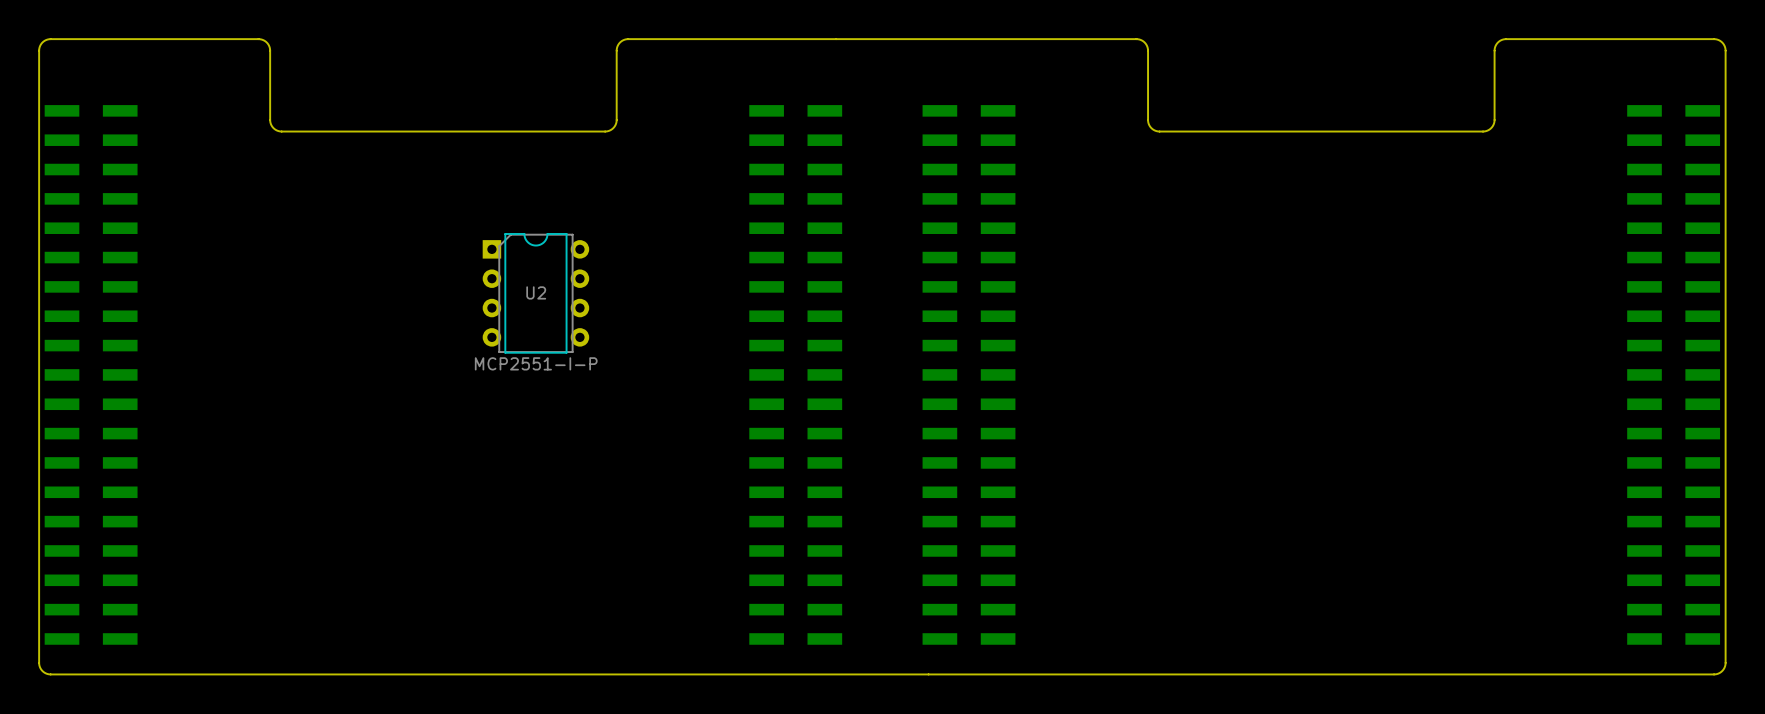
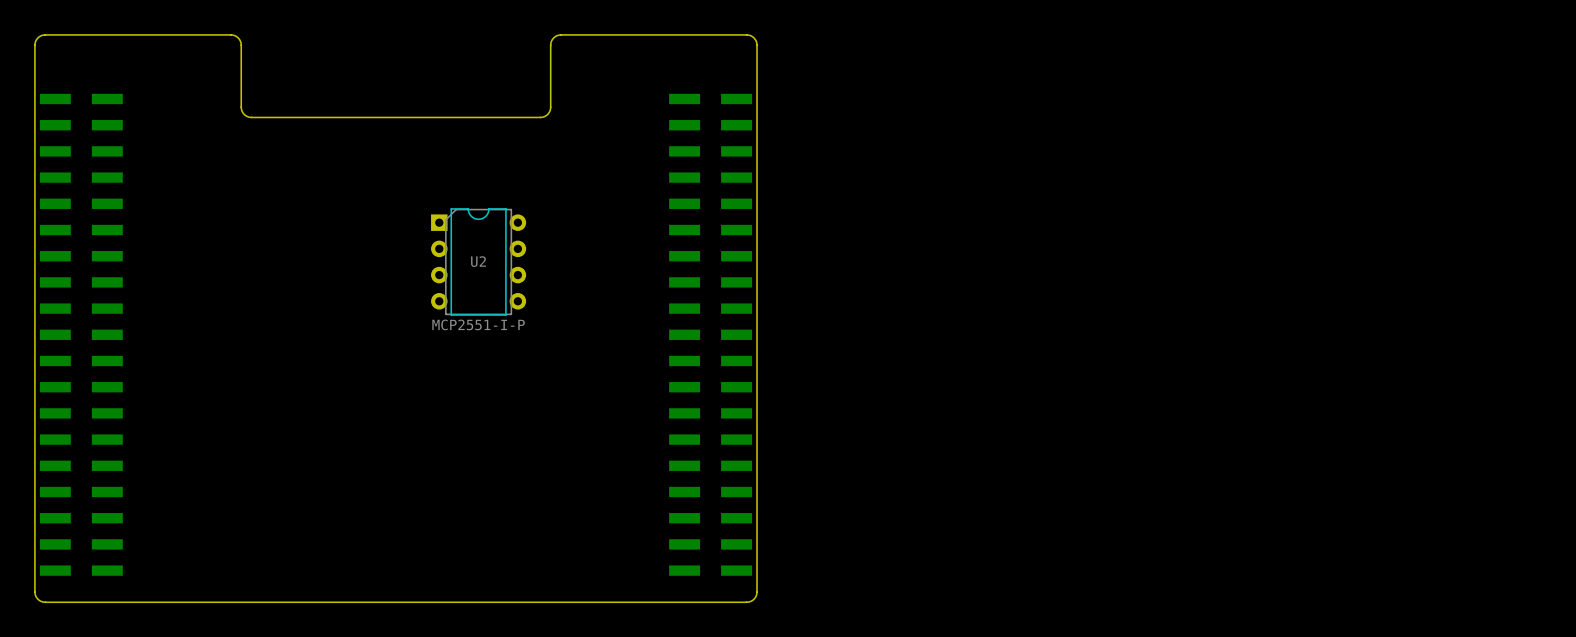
board edge: (836, 39) (1139, 39) (1145, 43) (1147, 49) (1148, 122) (1152, 129) (1159, 131) (1484, 131) (1490, 129) (1494, 122) (1494, 49) (1497, 43) (1502, 39) (1714, 39) (1722, 42) (1725, 50) (1725, 662) (1720, 672) (1714, 674) (836, 674) -> (746, 34) (753, 37) (757, 45) (757, 591) (753, 599) (746, 602)
part: (968, 374) -> none
part: (1673, 374) -> none

